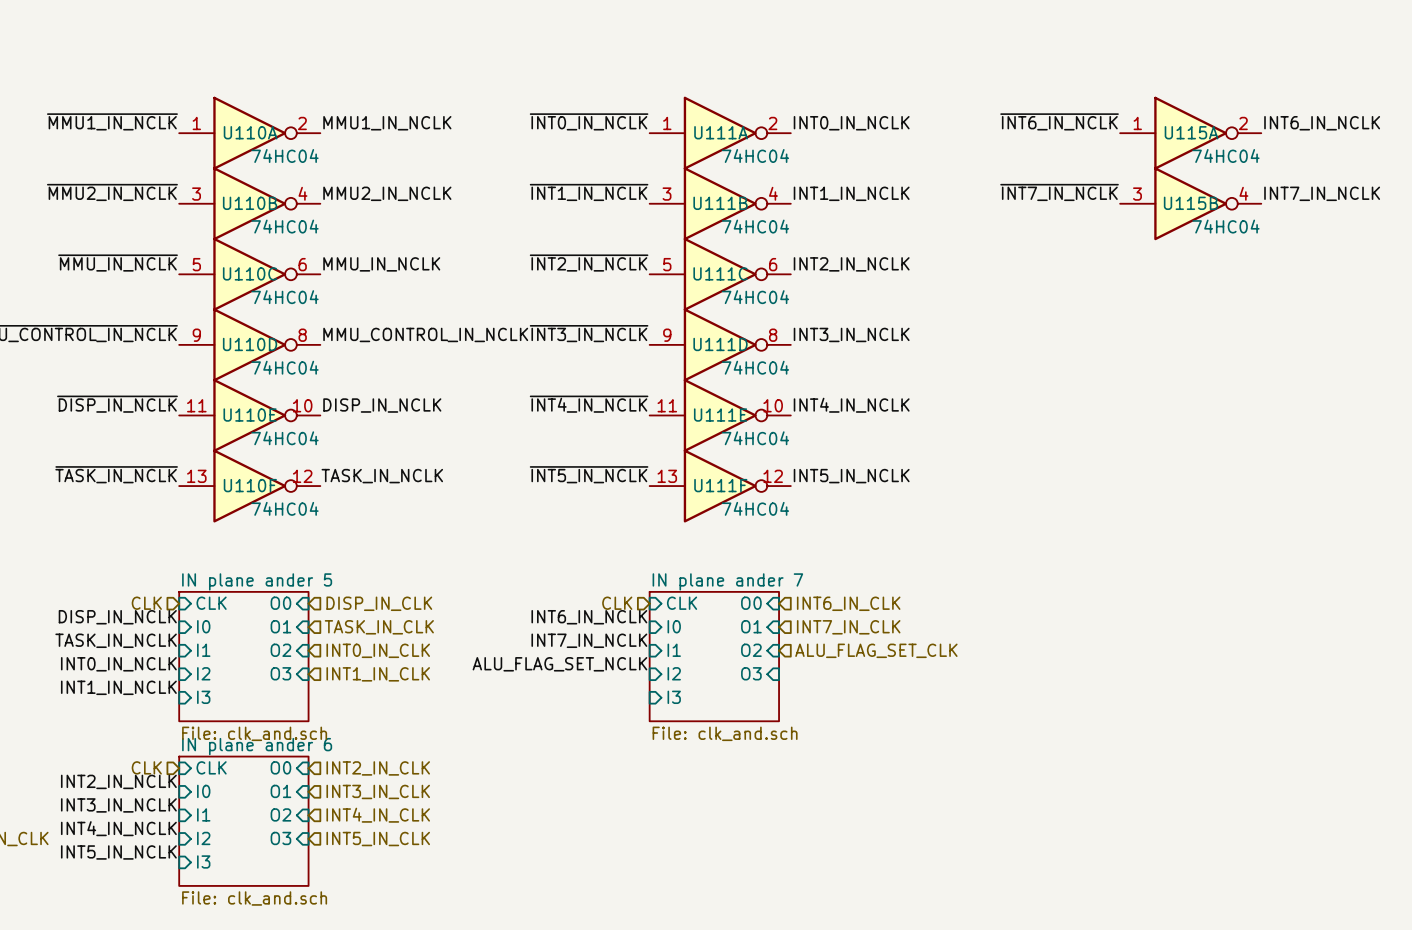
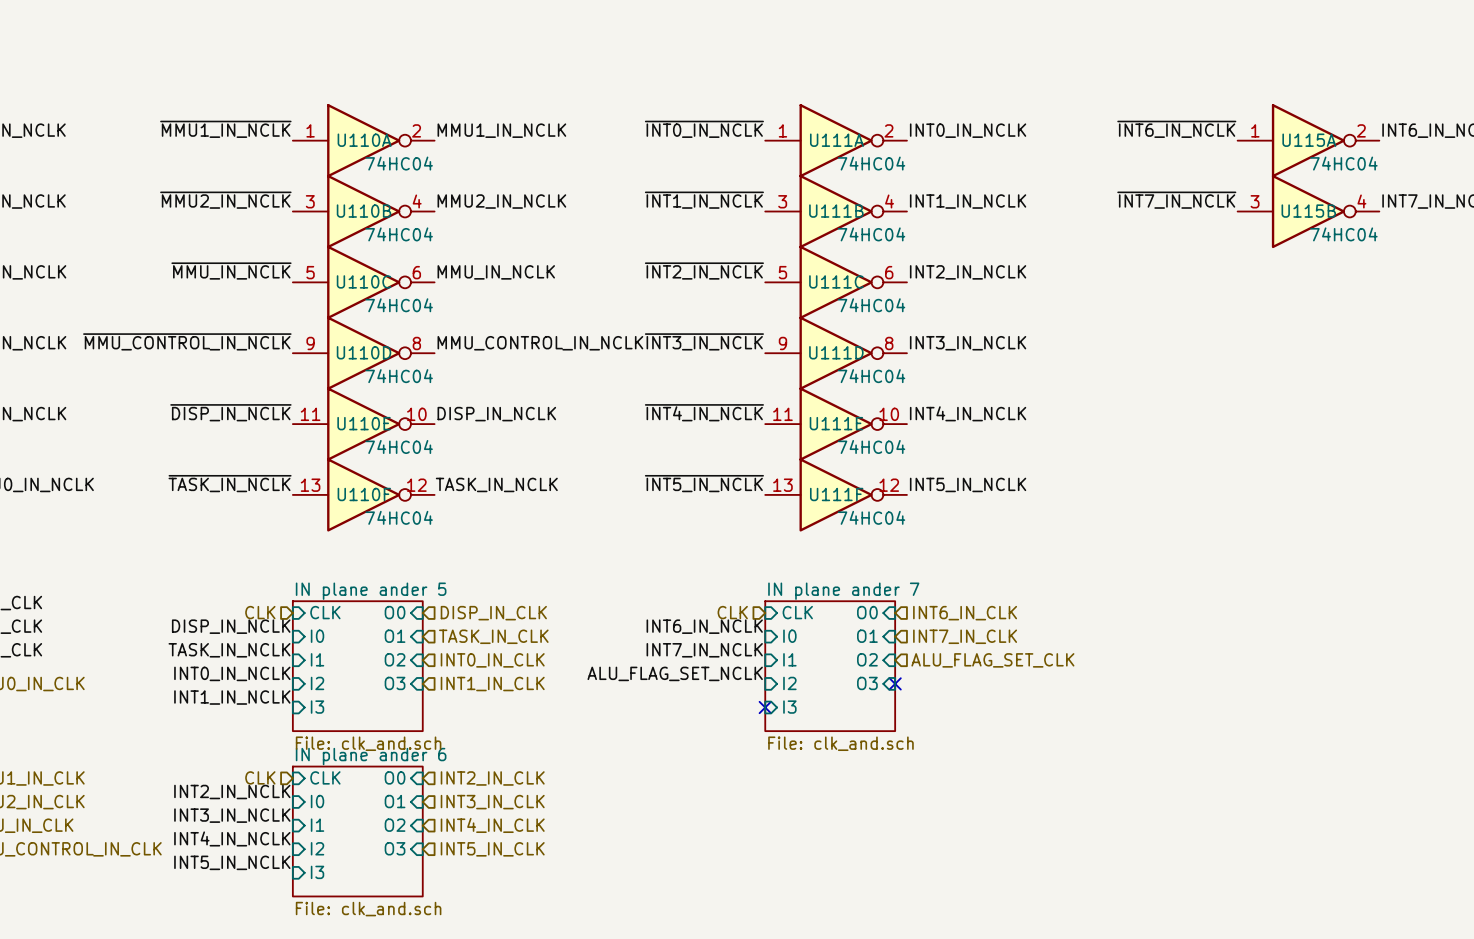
no-connect mark: none -> (895, 683)
no-connect mark: none -> (765, 707)

